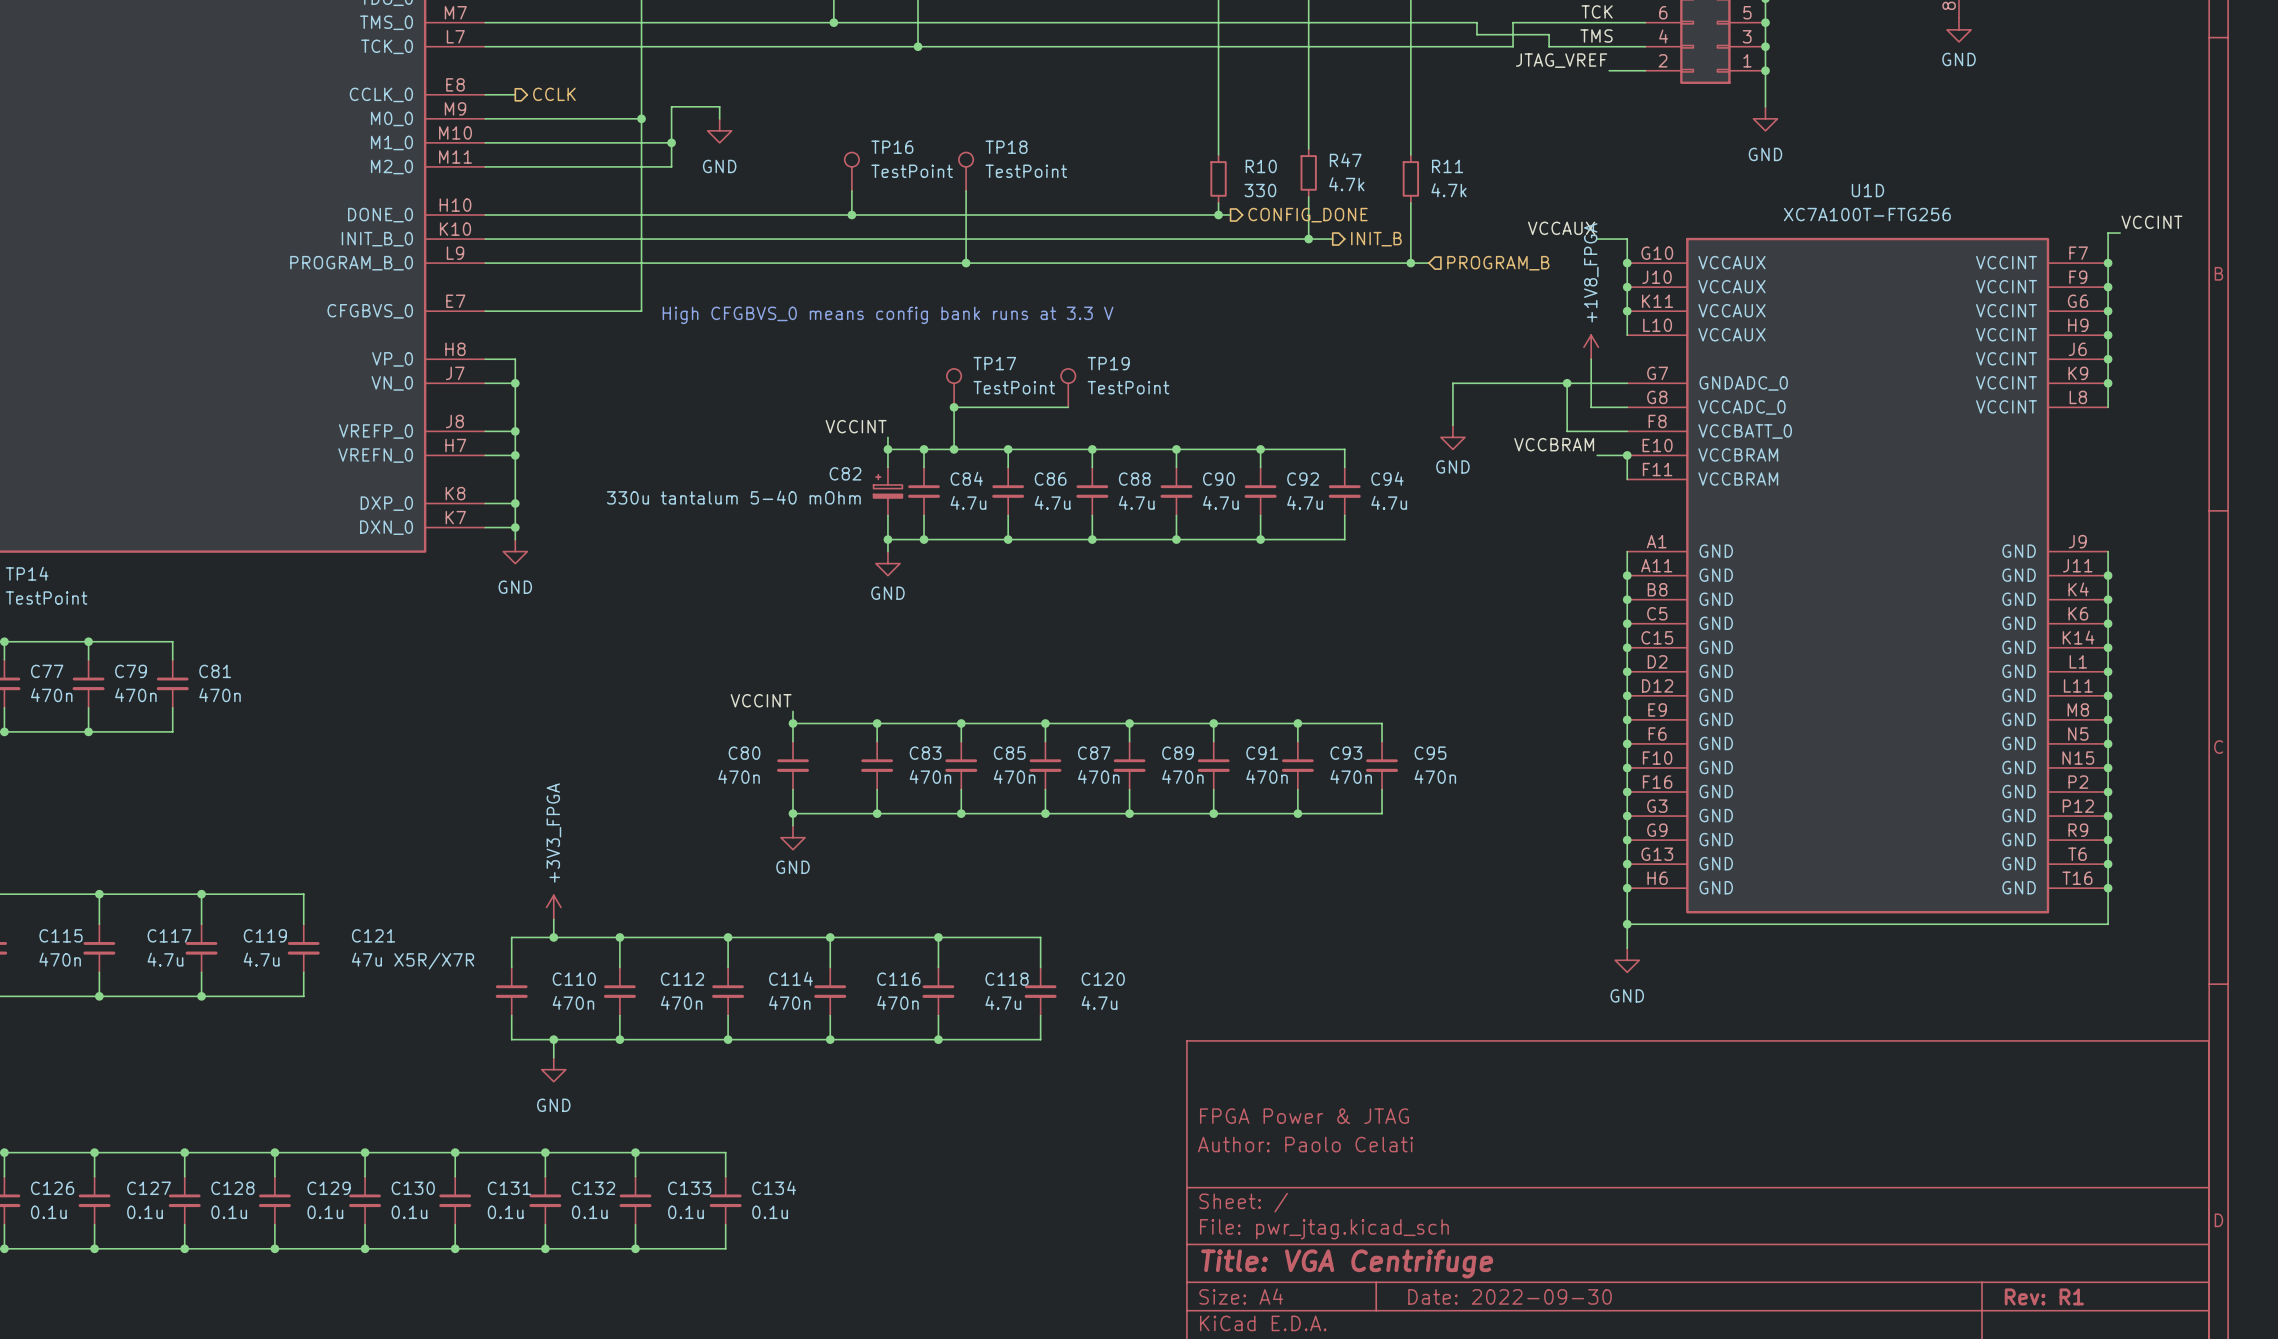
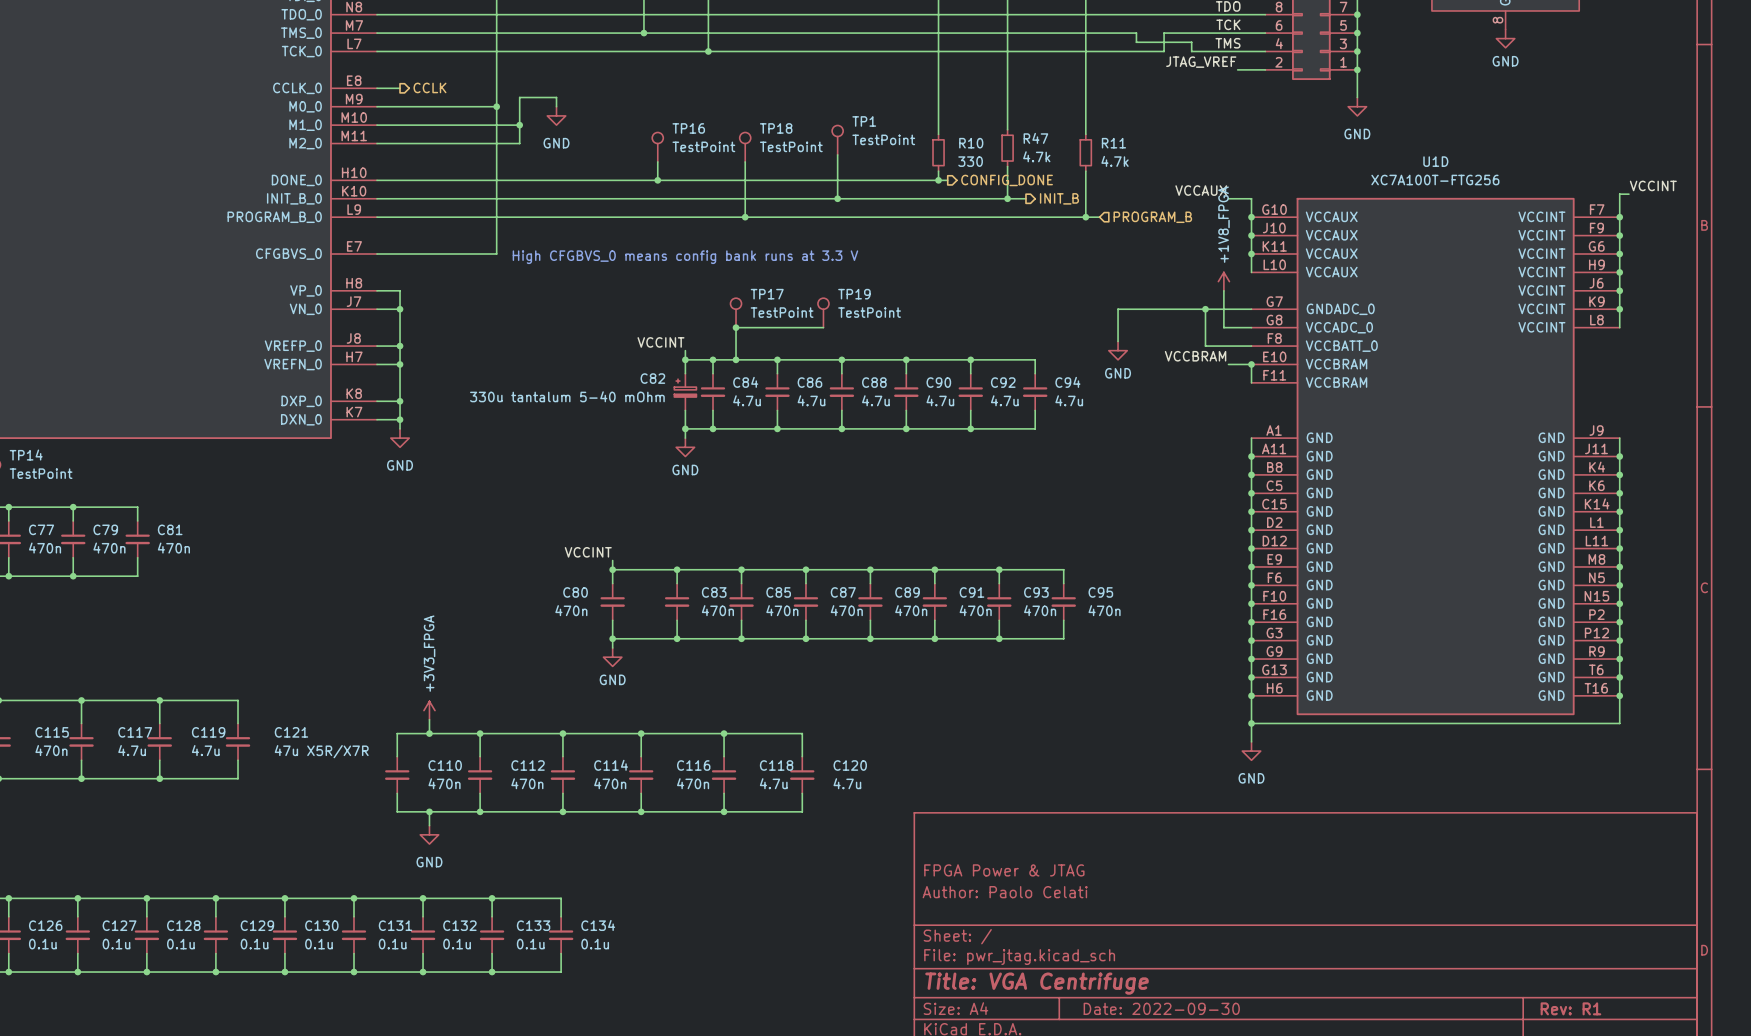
TP1: none -> TestPoint (837, 140)
wire: none -> (837, 154) (837, 198)
junction: none -> (837, 198)

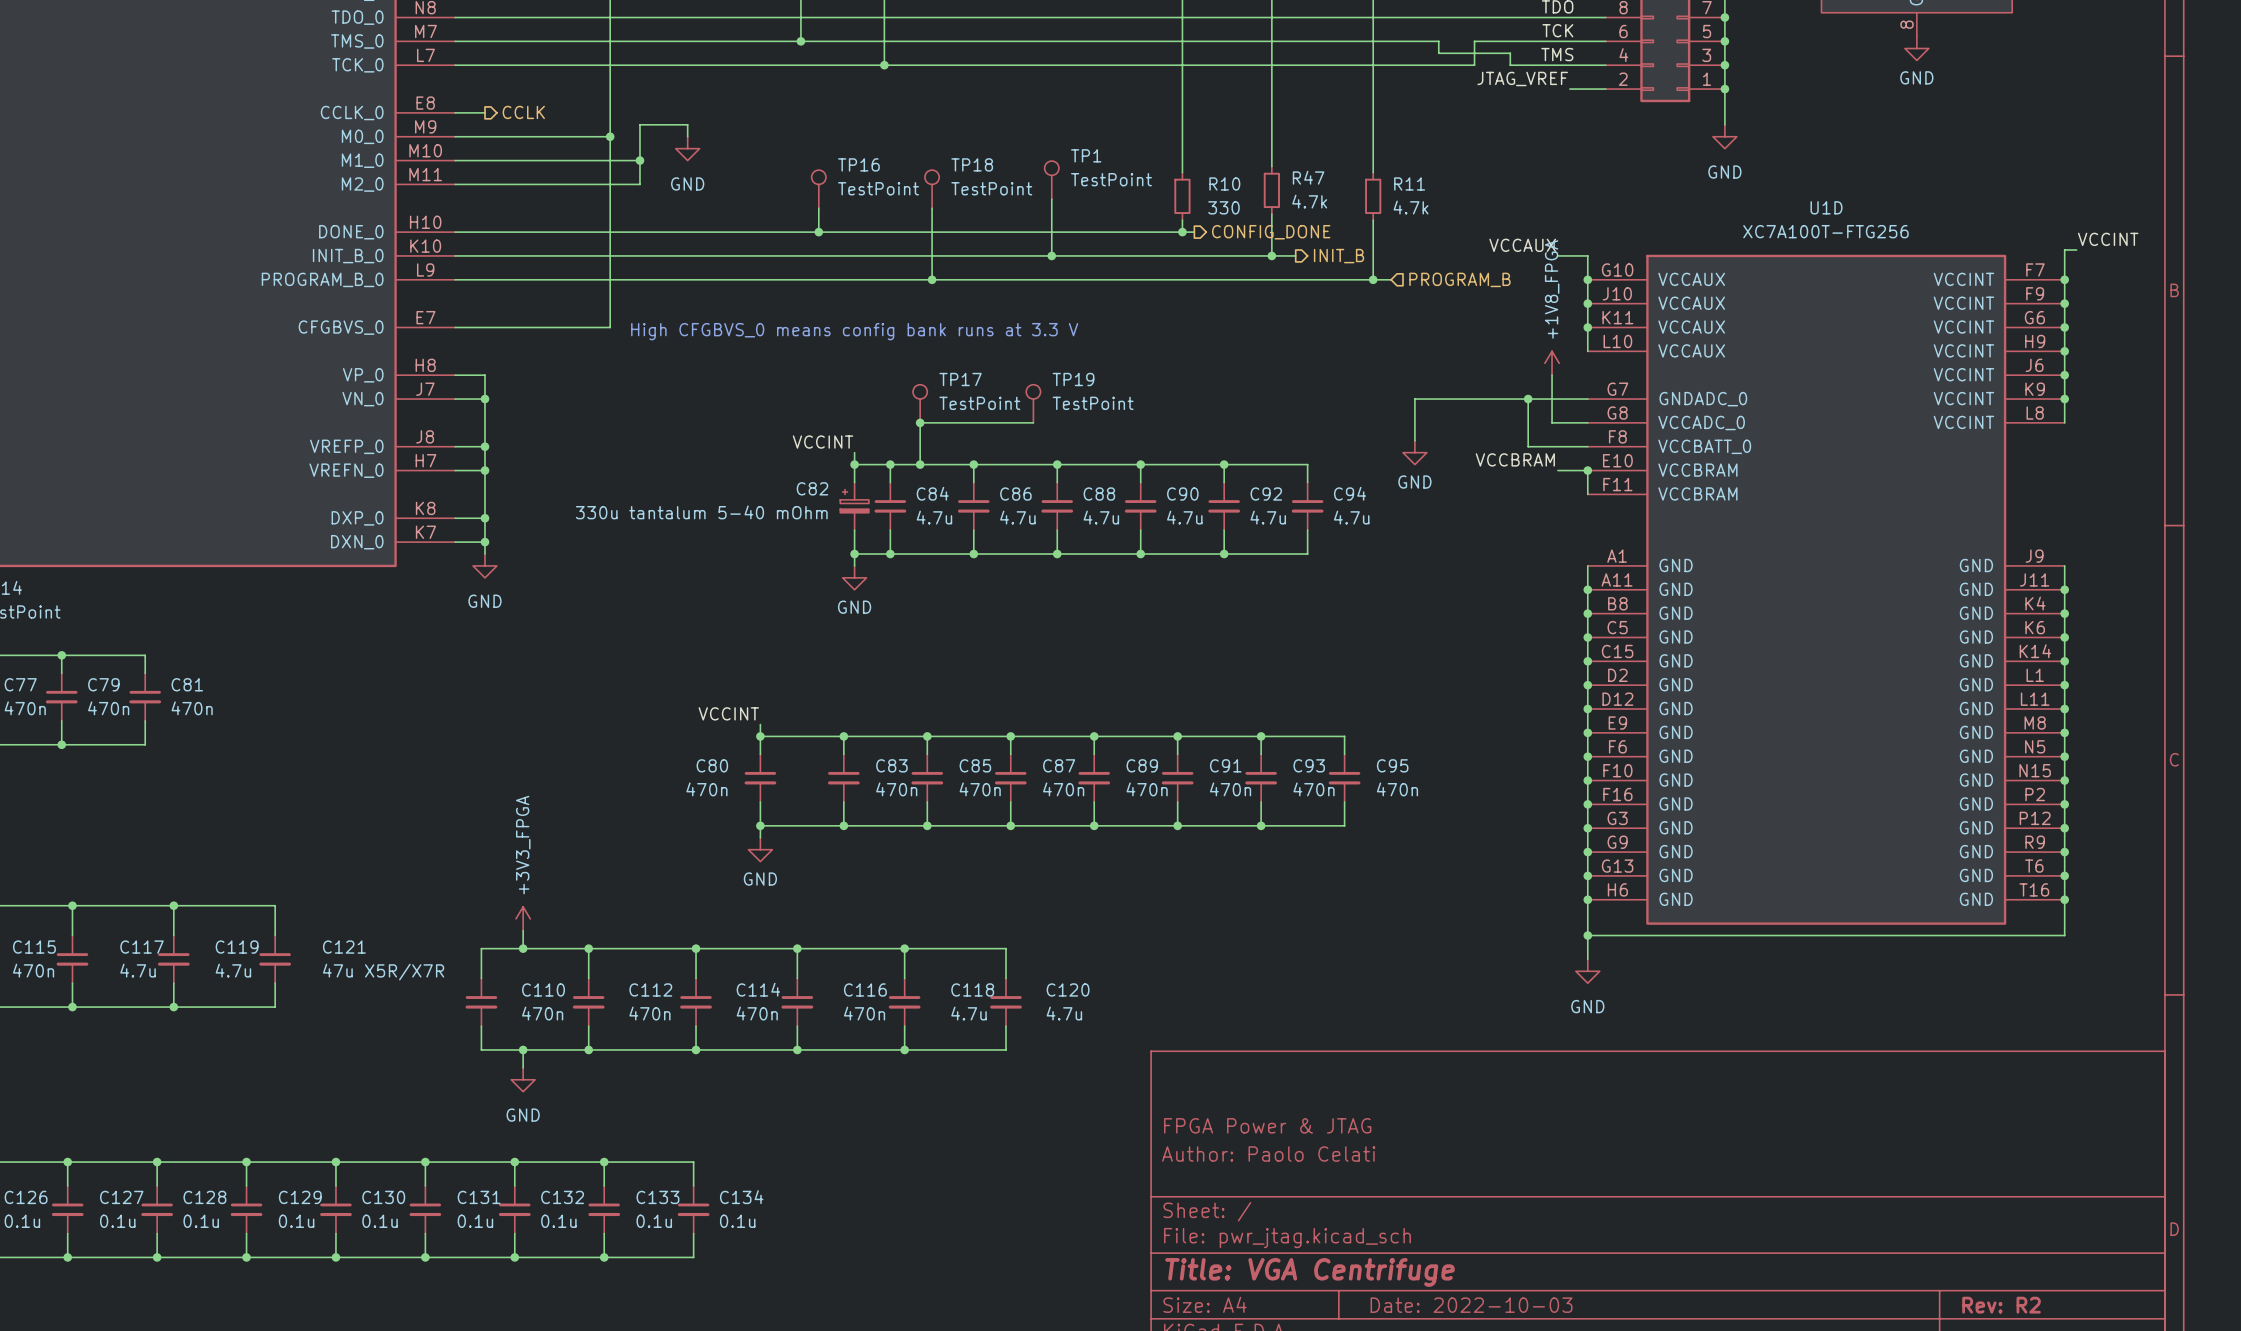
title block: Date: 2022-09-30 (1161, 1008) -> Date: 2022-10-03 (1471, 1305)
title block: Rev: R1 (1570, 1008) -> Rev: R2 (2001, 1305)

